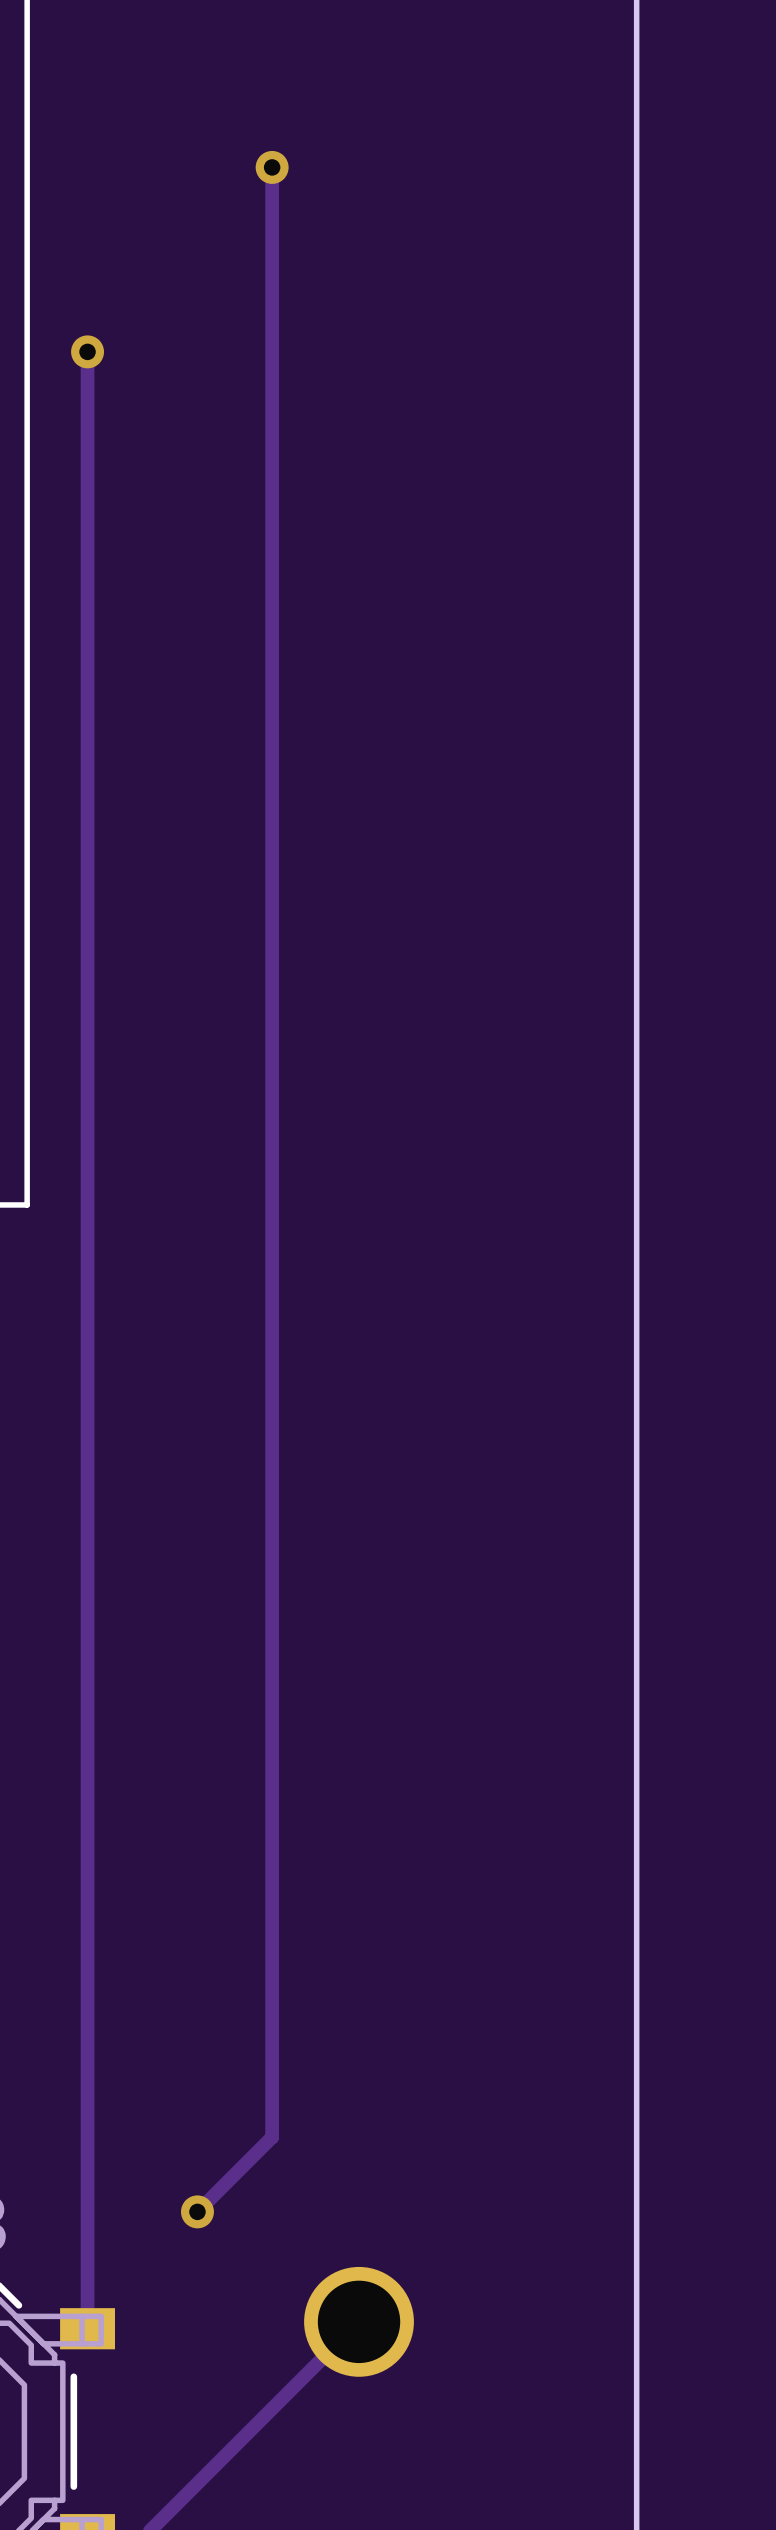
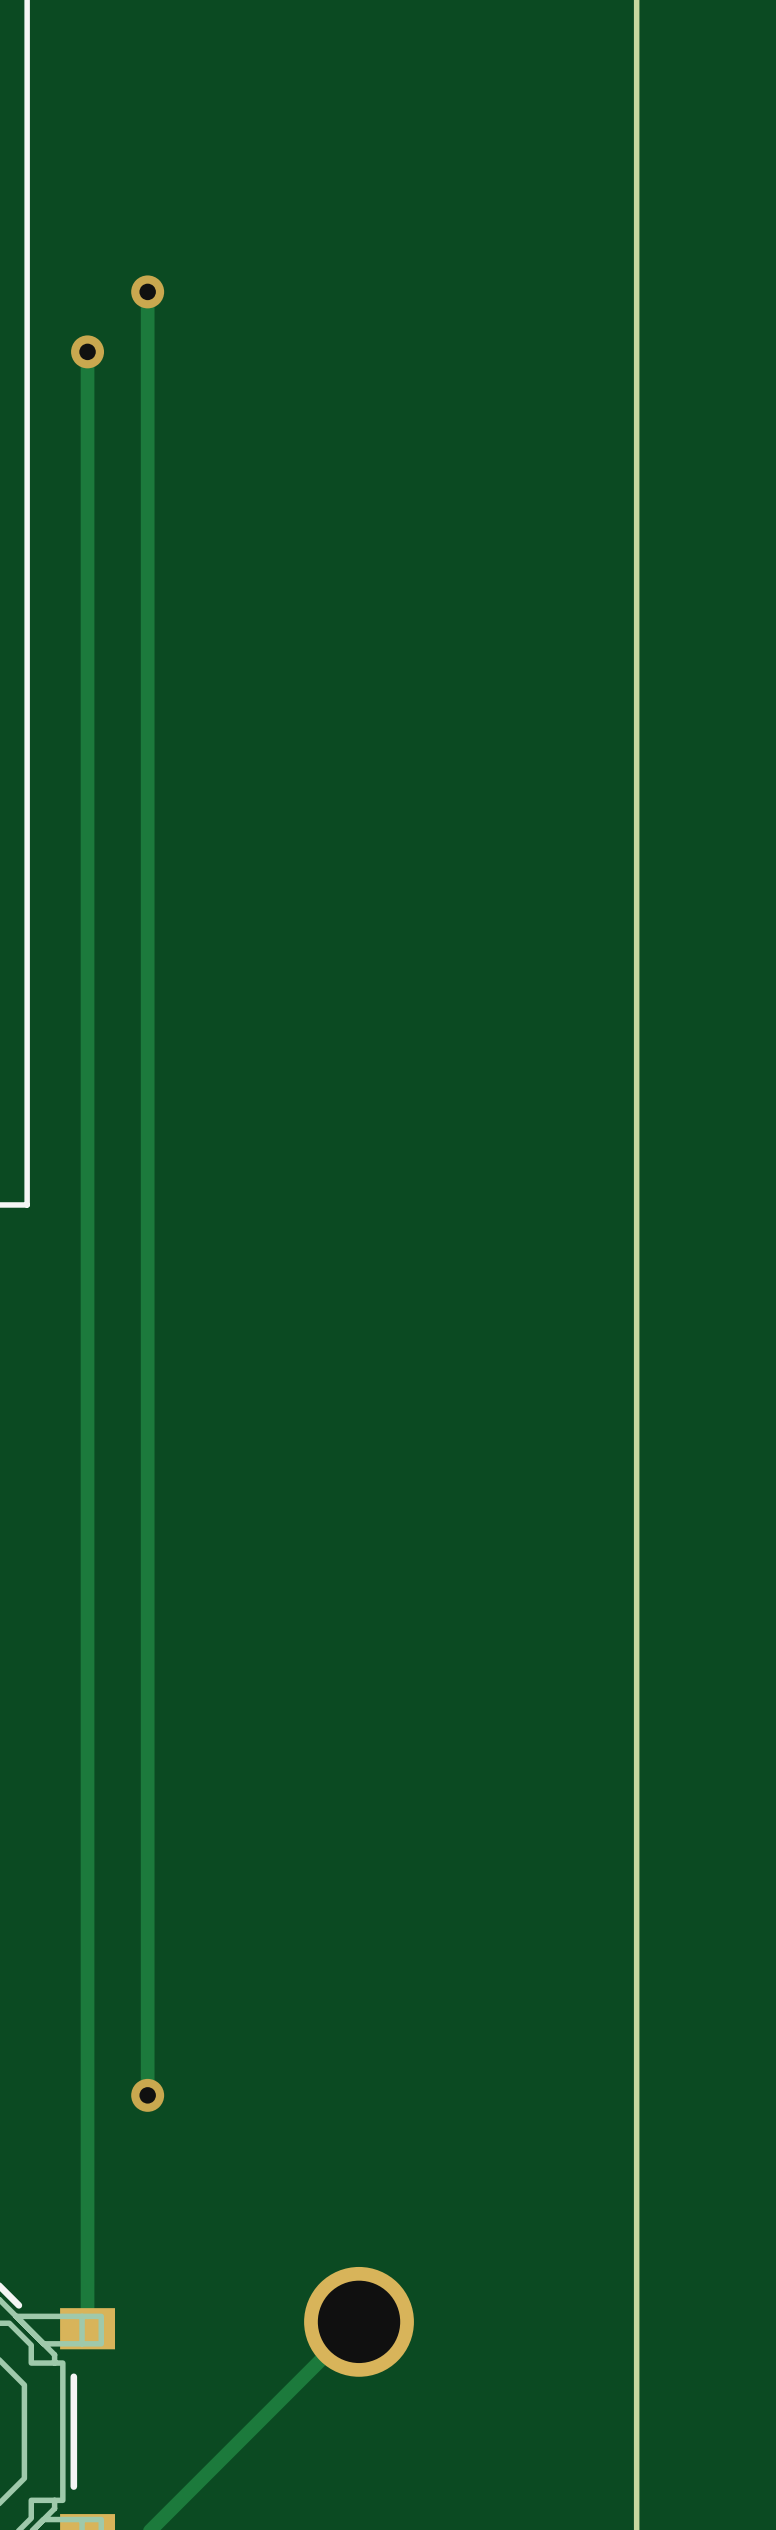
track: (272, 167) (272, 2137) (197, 2211) -> none
via position: (272, 167) -> (147, 291)
track: none -> (147, 291) (147, 2095)
via position: (197, 2211) -> (147, 2095)

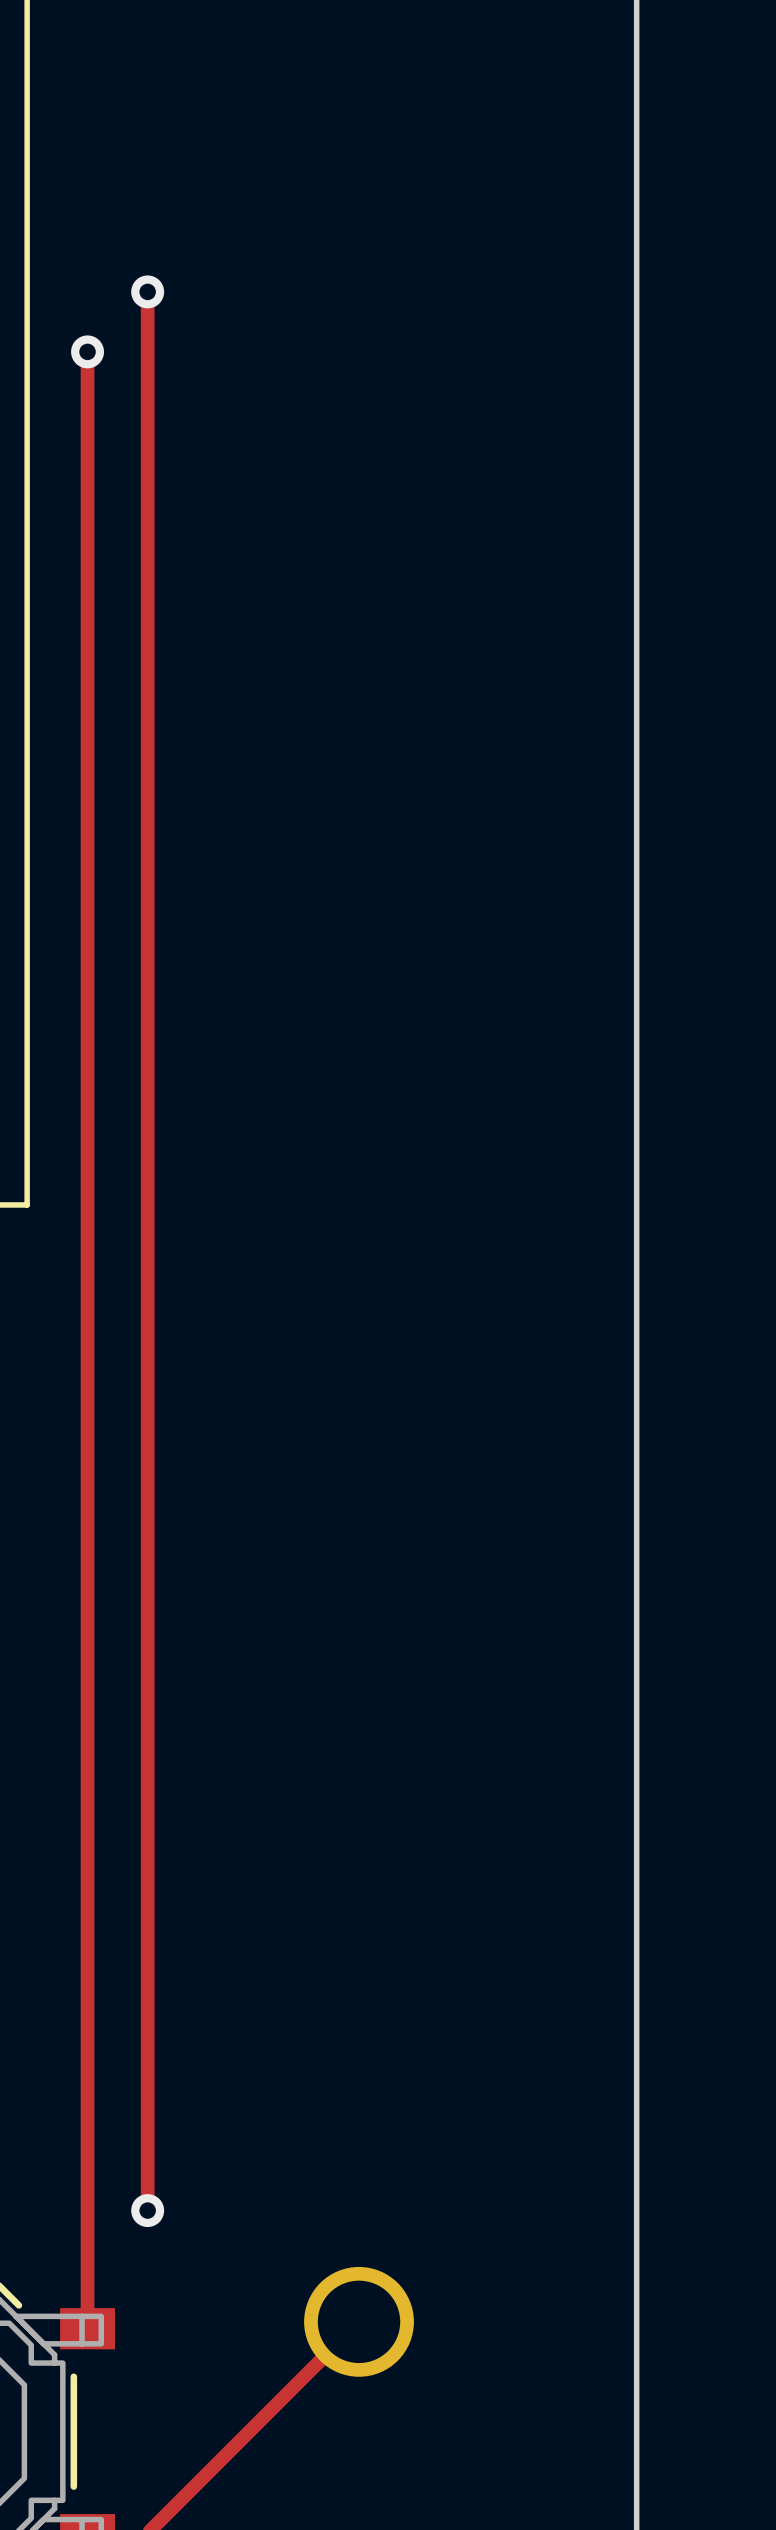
track: none -> (147, 2095) (147, 2210)
via position: (147, 2095) -> (147, 2210)

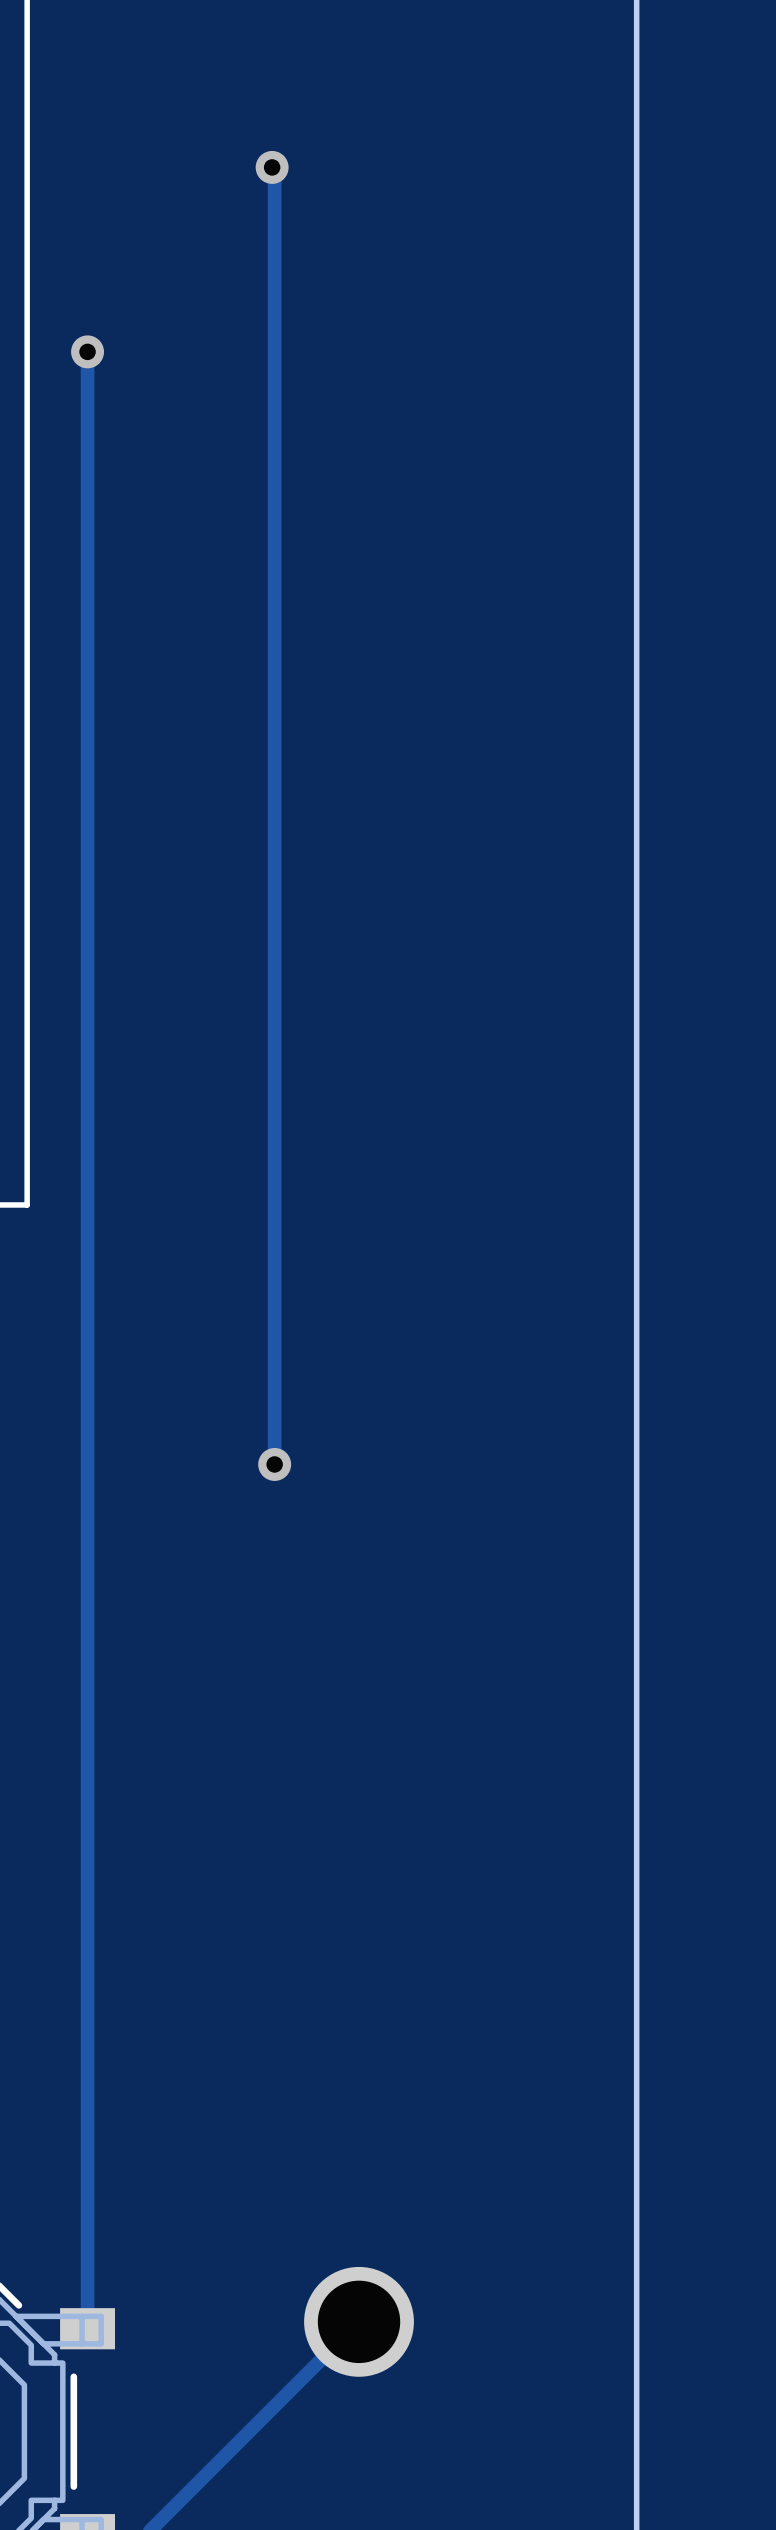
track: none -> (272, 167) (274, 169) (274, 1464)
track: (147, 290) (147, 2210) -> none
via position: (147, 291) -> (272, 167)
via: none -> (274, 1464)
via: (147, 2210) -> none

